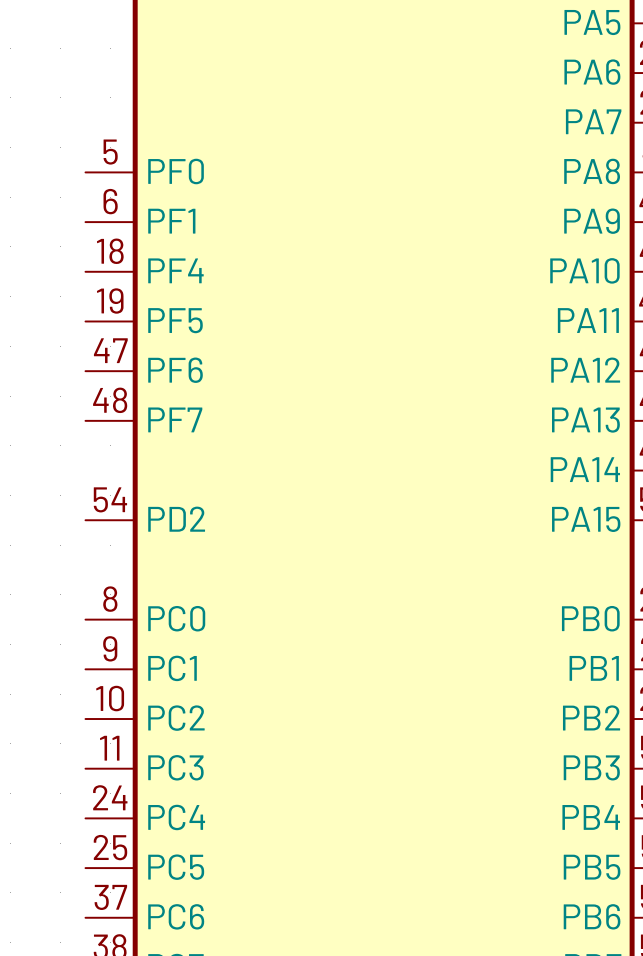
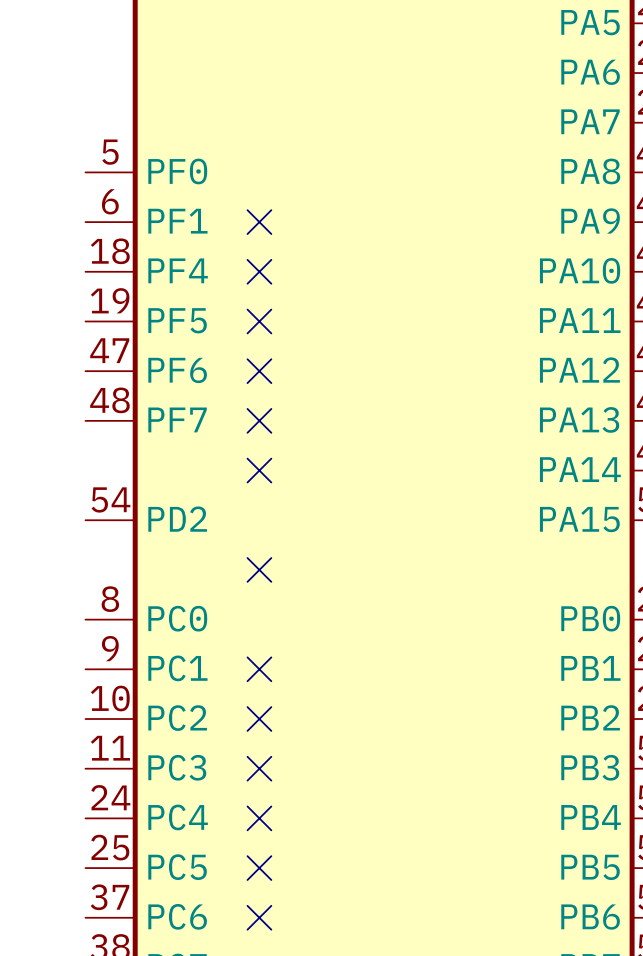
no-connect mark: none -> (259, 222)
no-connect mark: none -> (259, 271)
no-connect mark: none -> (259, 321)
no-connect mark: none -> (259, 371)
no-connect mark: none -> (259, 420)
no-connect mark: none -> (259, 470)
no-connect mark: none -> (259, 569)
no-connect mark: none -> (259, 669)
no-connect mark: none -> (259, 719)
no-connect mark: none -> (259, 768)
no-connect mark: none -> (259, 818)
no-connect mark: none -> (259, 868)
no-connect mark: none -> (259, 917)

